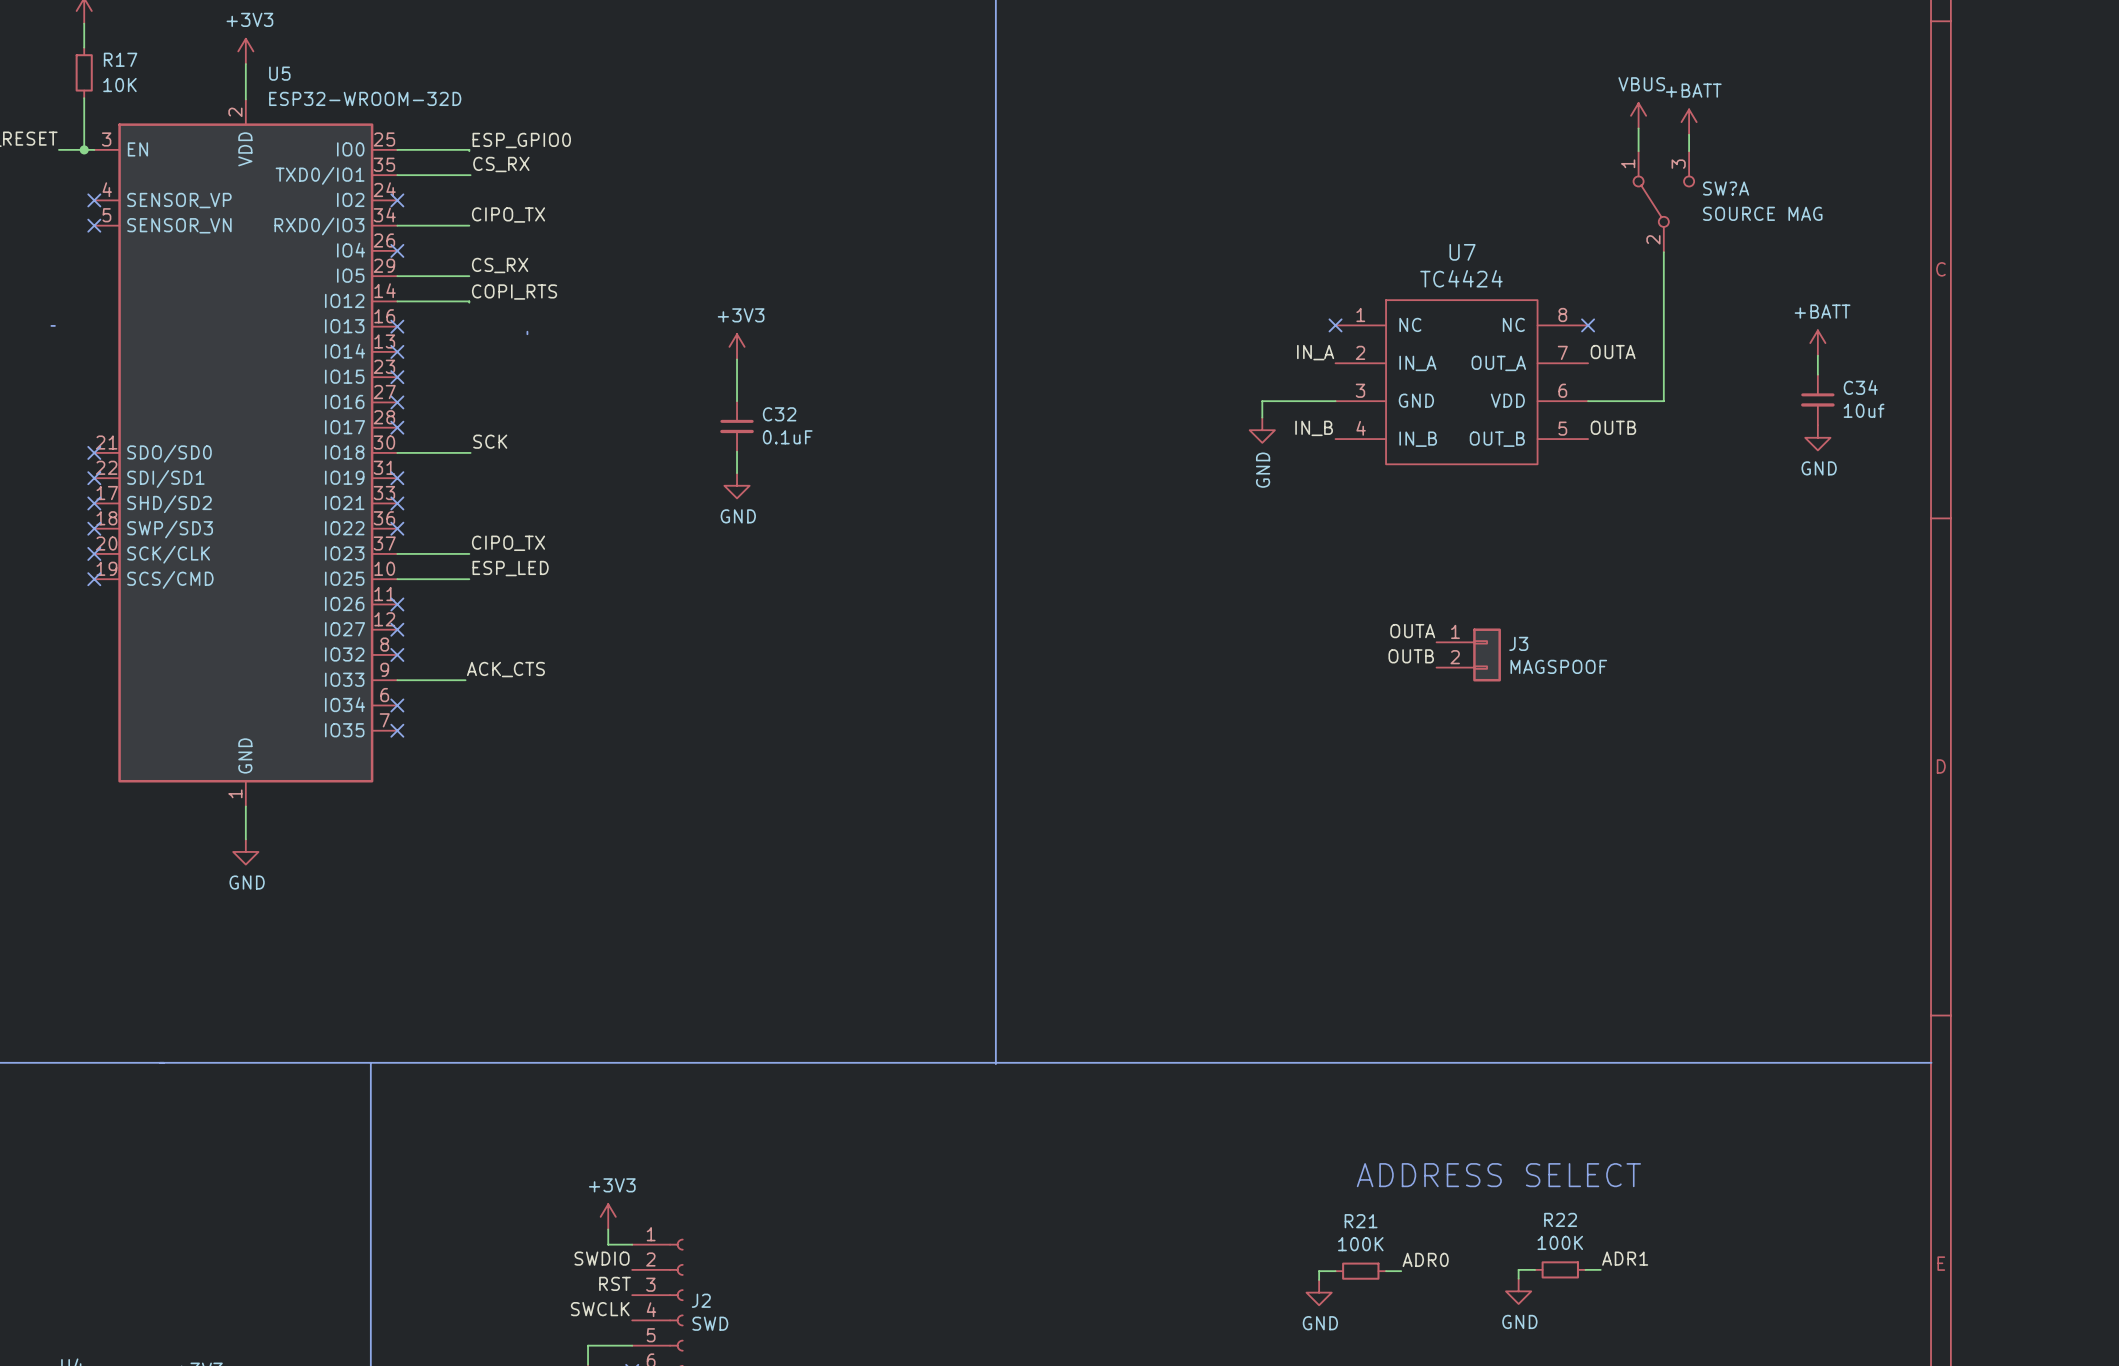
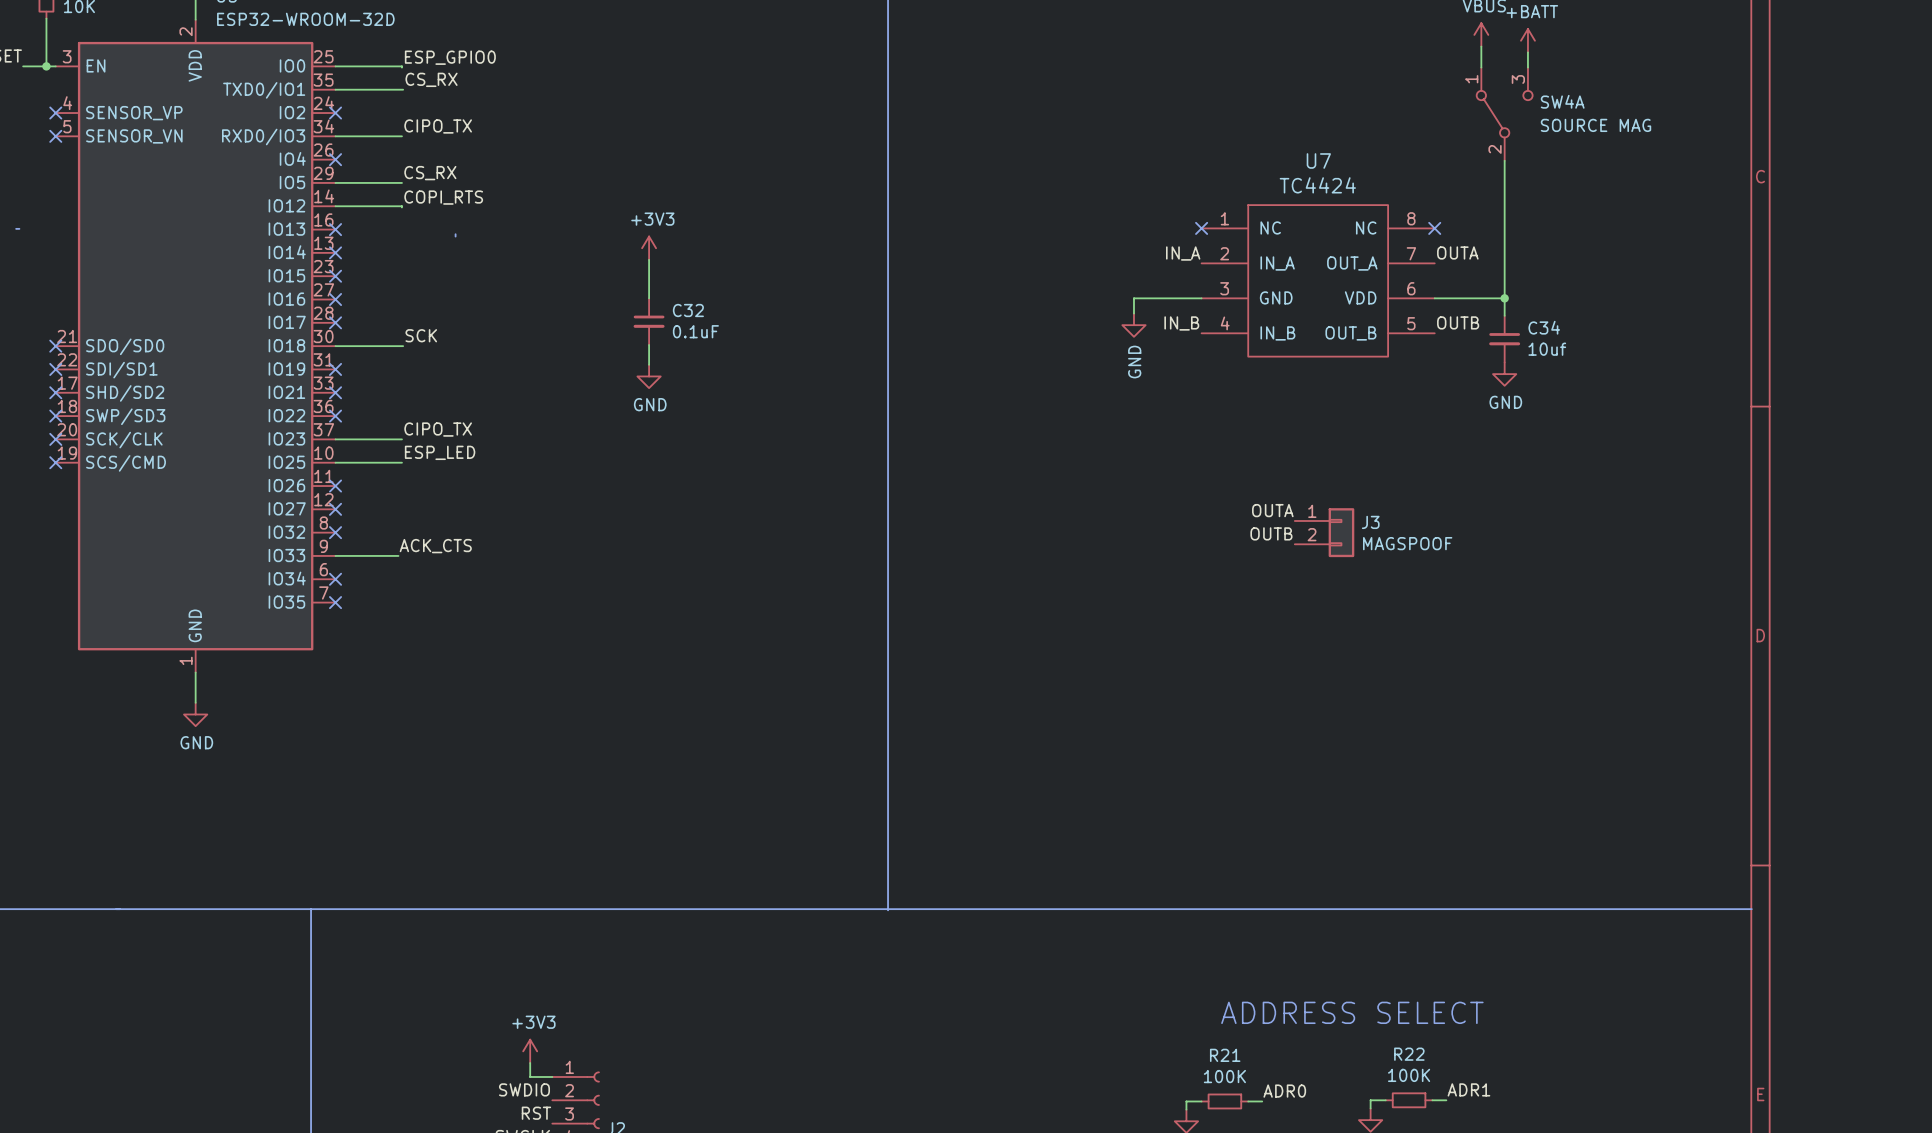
SW?A name: SW?A (1726, 188) -> SW4A (1562, 101)
power symbol: +BATT (1817, 343) -> none
wire: (1817, 355) (1817, 374) -> (1504, 298) (1504, 315)
C34 position: (1817, 399) -> (1504, 339)
junction: none -> (1504, 298)
power symbol position: GND (1817, 437) -> GND (1504, 374)

